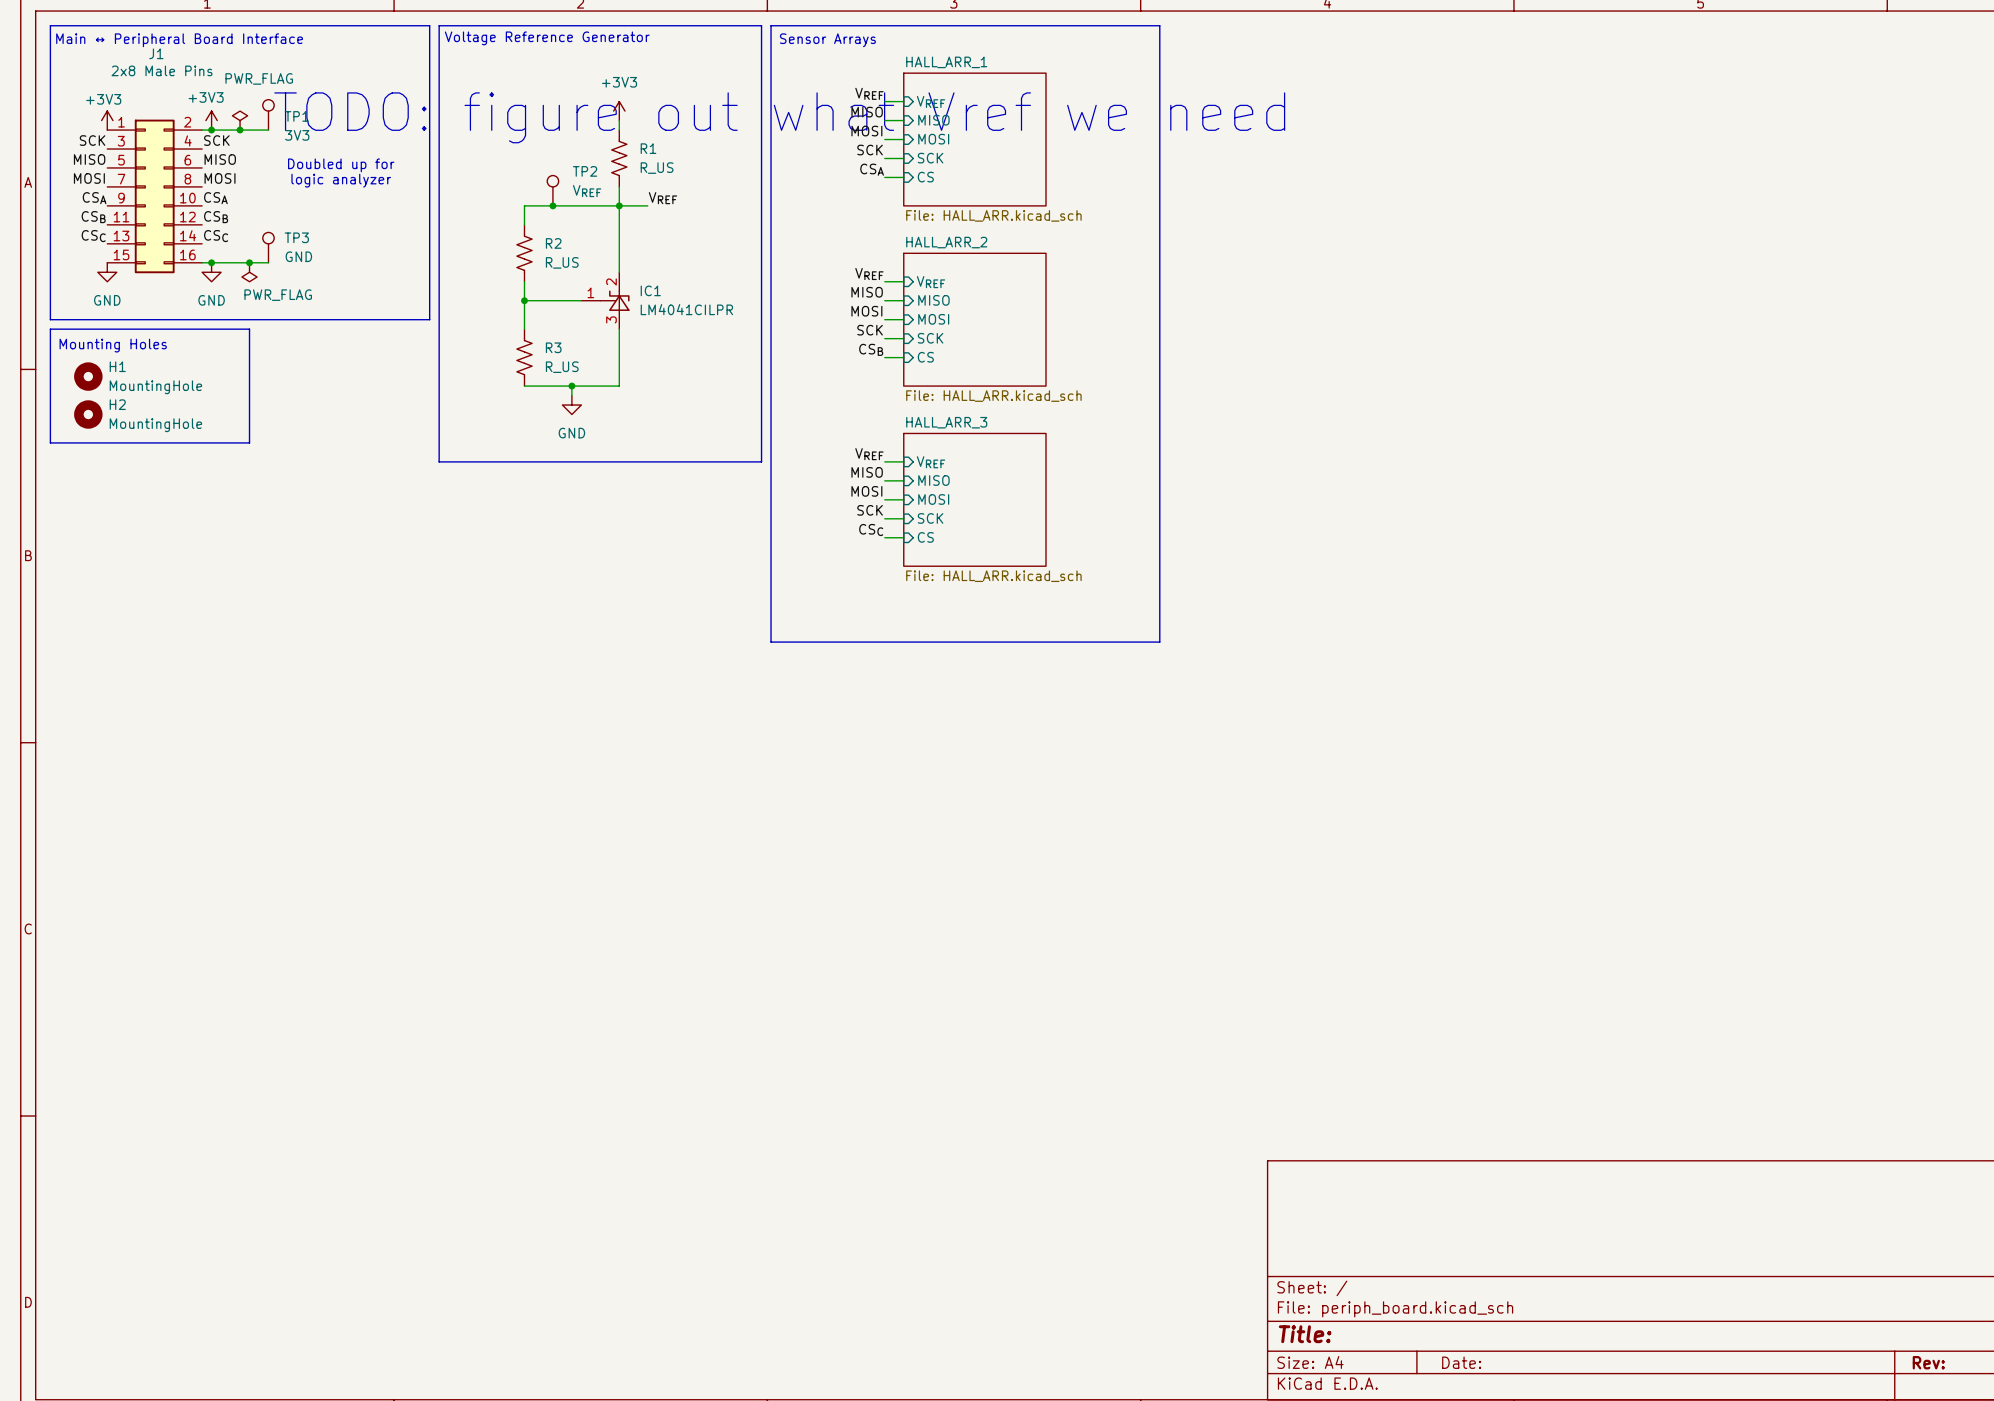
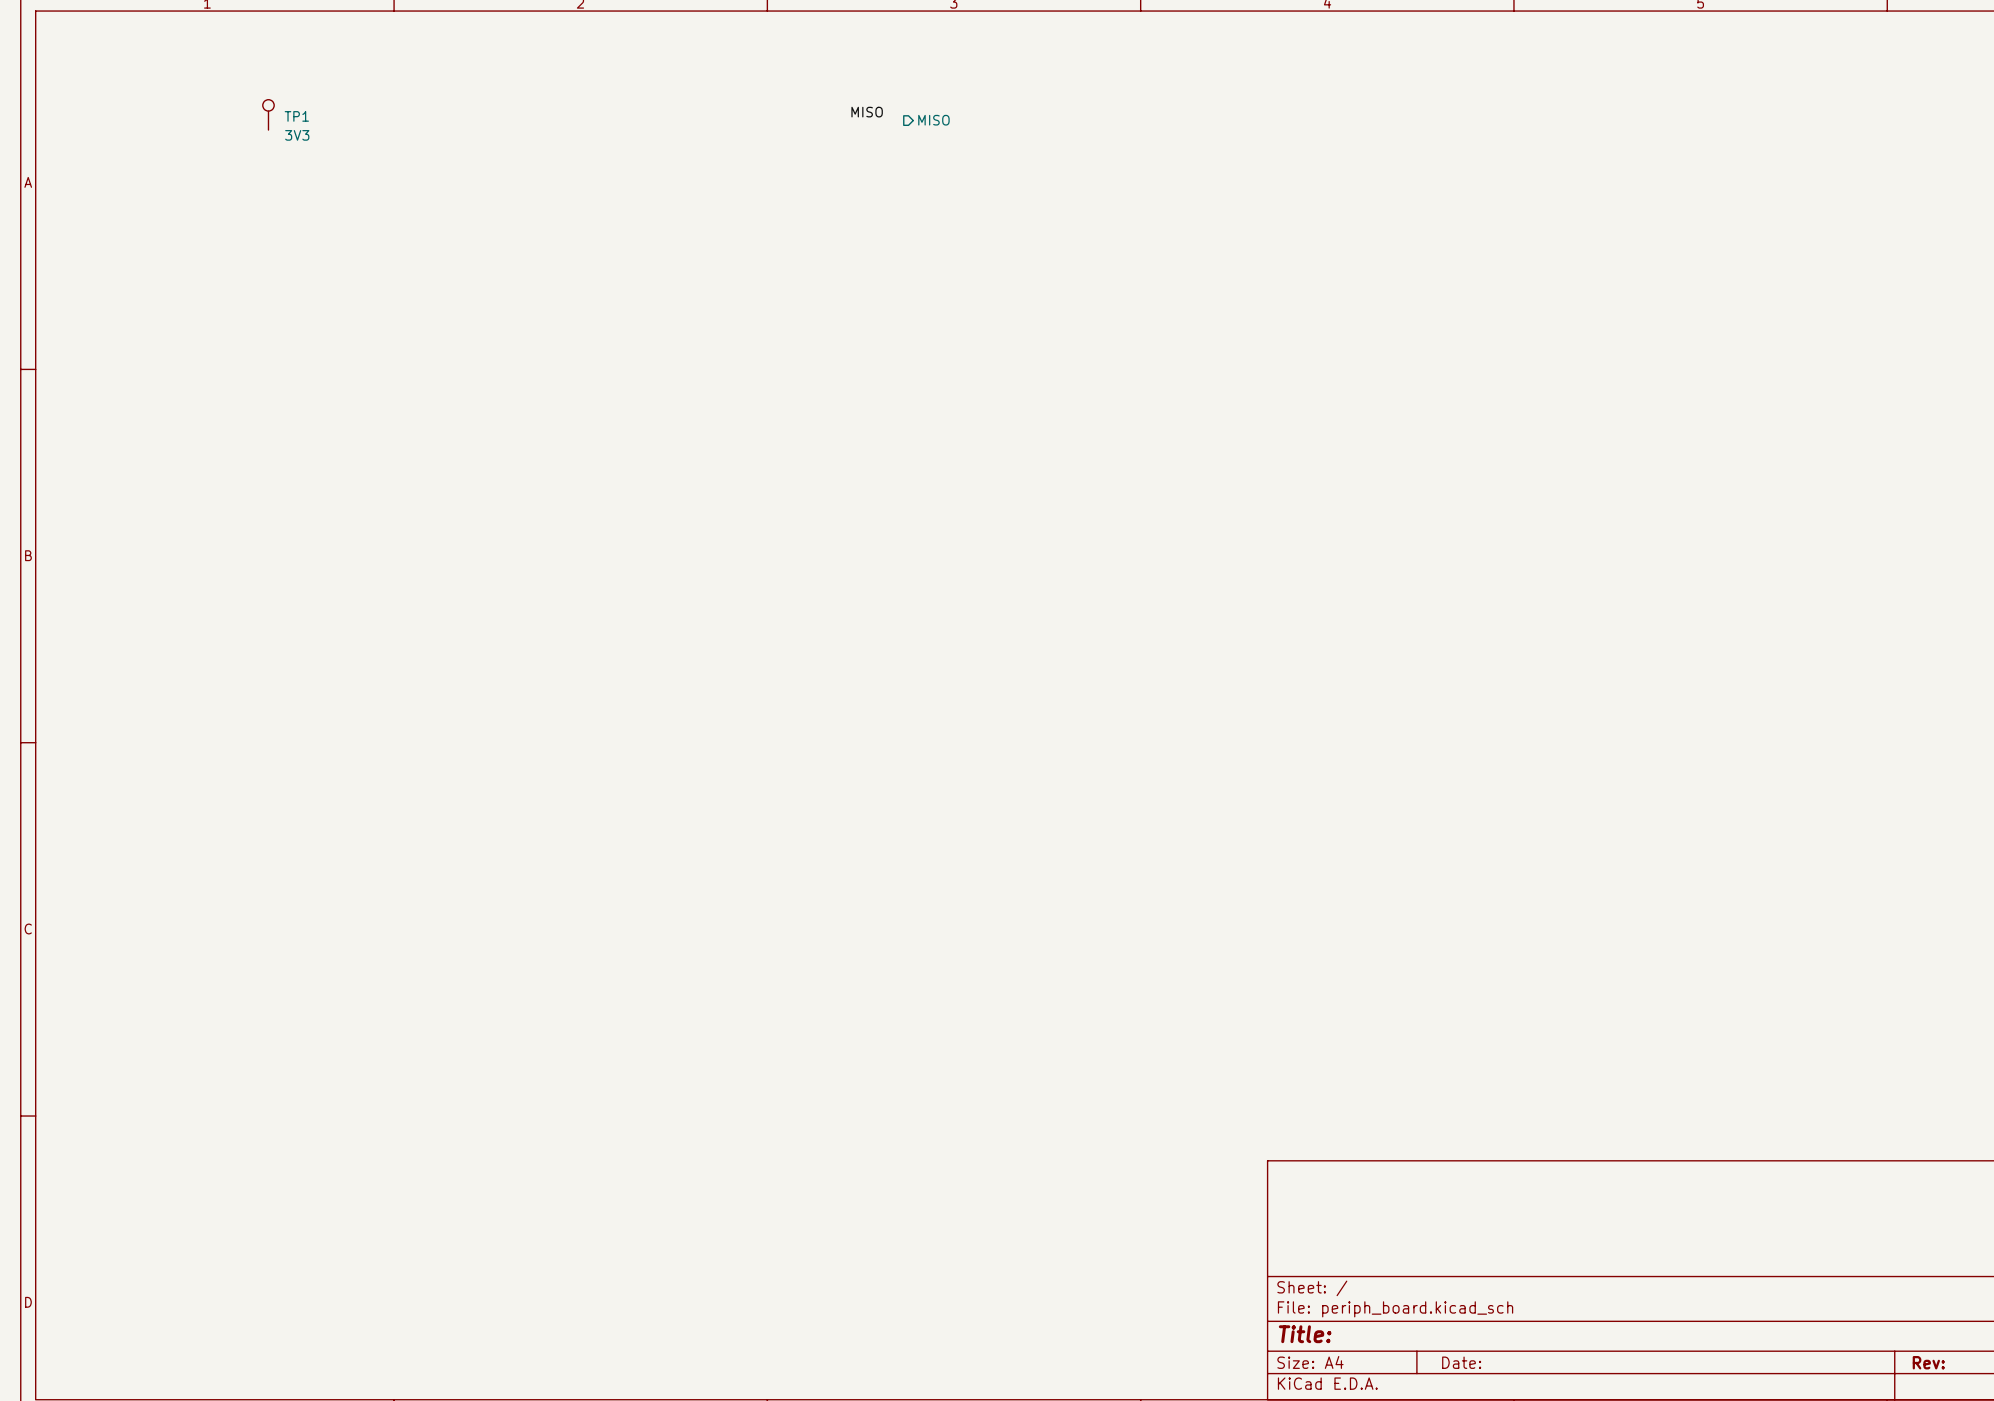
line: (50, 25) (429, 25) (429, 319) (50, 319) (50, 25) -> none
line: (439, 25) (761, 25) (761, 461) (439, 461) (439, 25) -> none
line: (771, 25) (1159, 25) (1159, 642) (771, 642) (771, 25) -> none
text: Voltage Reference Generator (547, 38) -> none
text: Main ↔ Peripheral Board Interface (179, 40) -> none
text: Sensor Arrays (827, 40) -> none
label: VREF (869, 93) -> none
wire: (884, 101) (903, 101) -> none
sheet pin: VREF (931, 101) -> none
power symbol: +3V3 (619, 111) -> none
text: TODO: figure out what Vref we need (779, 117) -> none
power symbol: +3V3 (107, 120) -> none
power symbol: +3V3 (211, 120) -> none
power symbol: PWR_FLAG (240, 120) -> none
wire: (619, 120) (619, 130) -> none
wire: (884, 120) (903, 120) -> none
wire: (202, 130) (268, 130) -> none
junction: (211, 130) -> none
junction: (240, 130) -> none
label: MOSI (866, 131) -> none
wire: (884, 139) (903, 139) -> none
sheet pin: MOSI (933, 139) -> none
sheet HALL_ARR_1: File: HALL_ARR.kicad_sch (974, 139) -> none
label: SCK (92, 140) -> none
label: SCK (216, 140) -> none
label: SCK (870, 150) -> none
R1: R_US (619, 158) -> none
wire: (884, 158) (903, 158) -> none
sheet pin: SCK (930, 158) -> none
label: MISO (89, 159) -> none
label: MISO (220, 159) -> none
text: Doubled up for (341, 165) -> none
label: CSA (872, 169) -> none
wire: (884, 177) (903, 177) -> none
sheet pin: CS (925, 177) -> none
label: MOSI (89, 178) -> none
label: MOSI (220, 178) -> none
text: logic analyzer (341, 180) -> none
wire: (619, 186) (619, 272) -> none
TP2: VREF (552, 190) -> none
J1: 2x8 Male Pins (154, 196) -> none
label: CSA (94, 198) -> none
label: CSA (215, 198) -> none
label: VREF (662, 198) -> none
junction: (552, 205) -> none
junction: (619, 205) -> none
wire: (647, 205) (524, 205) (524, 224) -> none
label: CSB (93, 217) -> none
label: CSB (216, 217) -> none
label: CSC (93, 236) -> none
label: CSC (216, 236) -> none
TP3: GND (268, 247) -> none
R2: R_US (524, 253) -> none
wire: (202, 262) (268, 262) -> none
junction: (211, 262) -> none
junction: (249, 262) -> none
power symbol: GND (107, 272) -> none
power symbol: GND (211, 272) -> none
power symbol: PWR_FLAG (249, 272) -> none
label: VREF (869, 274) -> none
wire: (524, 281) (524, 329) -> none
wire: (884, 281) (903, 281) -> none
sheet pin: VREF (931, 282) -> none
label: MISO (867, 292) -> none
wire: (524, 300) (581, 300) -> none
junction: (524, 300) -> none
IC1: LM4041CILPR (605, 300) -> none
wire: (884, 300) (903, 300) -> none
sheet pin: MISO (933, 300) -> none
label: MOSI (866, 311) -> none
wire: (884, 319) (903, 319) -> none
sheet pin: MOSI (933, 319) -> none
sheet HALL_ARR_2: File: HALL_ARR.kicad_sch (974, 319) -> none
line: (50, 329) (249, 329) (249, 442) (50, 442) (50, 329) -> none
wire: (619, 329) (619, 386) (524, 386) -> none
label: SCK (870, 330) -> none
wire: (884, 338) (903, 338) -> none
sheet pin: SCK (930, 338) -> none
text: Mounting Holes (113, 345) -> none
label: CSB (871, 349) -> none
R3: R_US (524, 357) -> none
wire: (884, 357) (903, 357) -> none
sheet pin: CS (925, 357) -> none
H1: MountingHole (88, 376) -> none
wire: (571, 386) (571, 395) -> none
junction: (571, 386) -> none
power symbol: GND (571, 405) -> none
H2: MountingHole (88, 414) -> none
label: VREF (869, 454) -> none
wire: (884, 461) (903, 461) -> none
sheet pin: VREF (931, 462) -> none
label: MISO (867, 472) -> none
wire: (884, 480) (903, 480) -> none
sheet pin: MISO (933, 480) -> none
label: MOSI (866, 491) -> none
wire: (884, 499) (903, 499) -> none
sheet pin: MOSI (933, 499) -> none
sheet HALL_ARR_3: File: HALL_ARR.kicad_sch (974, 499) -> none
label: SCK (870, 510) -> none
wire: (884, 518) (903, 518) -> none
sheet pin: SCK (930, 518) -> none
label: CSC (871, 530) -> none
wire: (884, 537) (903, 537) -> none
sheet pin: CS (925, 537) -> none

